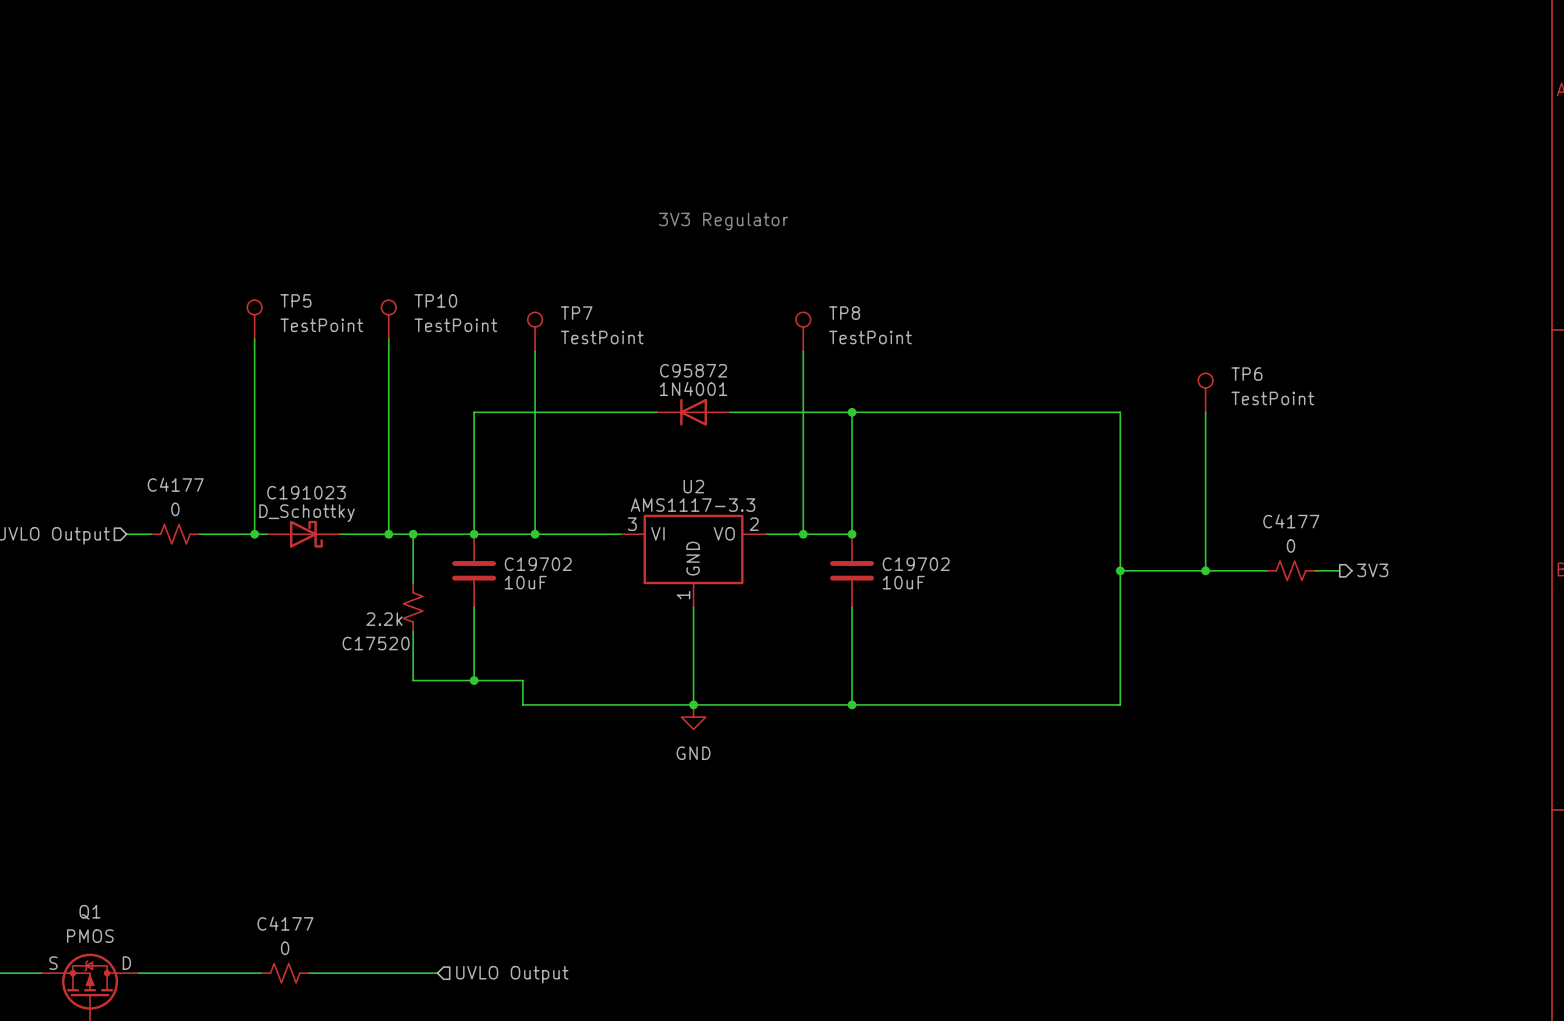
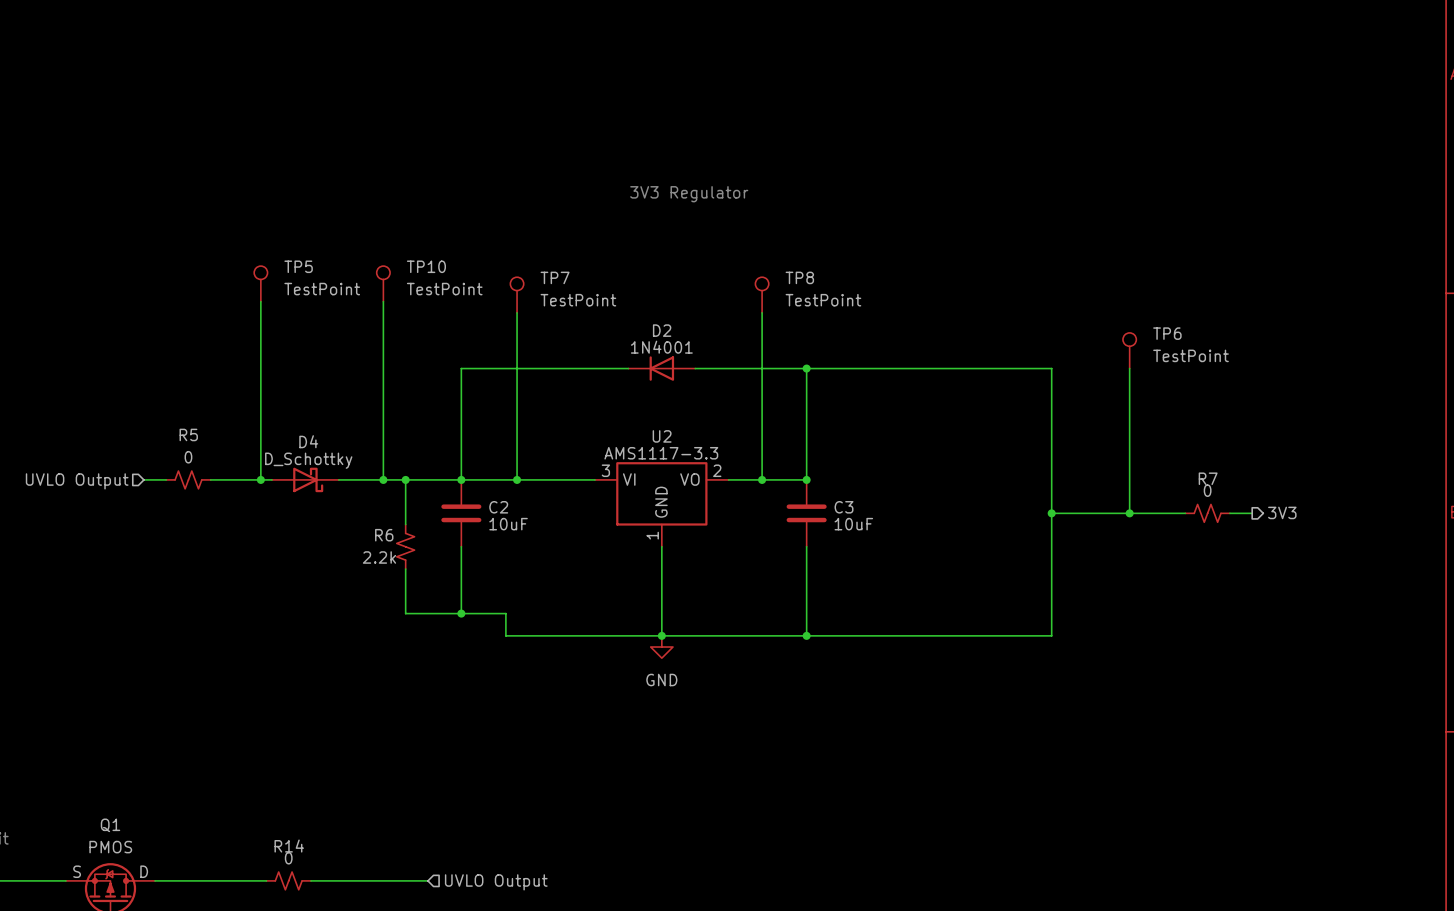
C95872 name: C95872 (693, 370) -> D2 (662, 330)
C4177 name: C4177 (175, 484) -> R5 (188, 434)
C191023 name: C191023 (306, 492) -> D4 (308, 441)
C4177 name: C4177 (1291, 521) -> R7 (1208, 478)
C19702 name: C19702 (538, 564) -> C2 (498, 507)
C19702 name: C19702 (916, 564) -> C3 (844, 507)
C17520 name: C17520 (376, 643) -> R6 (384, 535)
C4177 name: C4177 (285, 923) -> R14 (289, 846)

